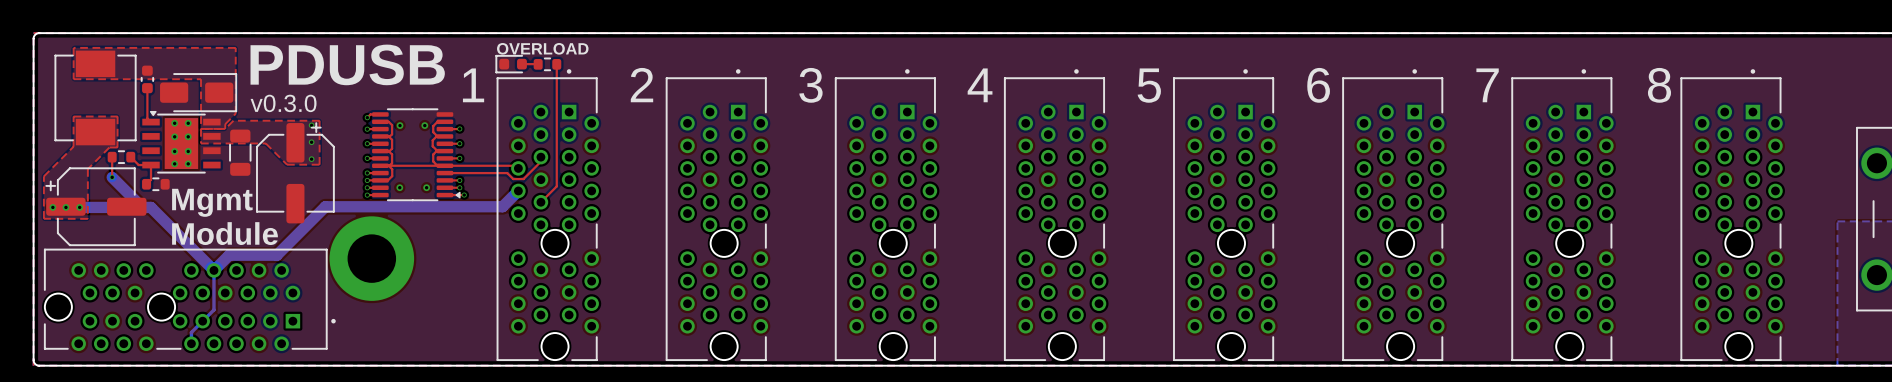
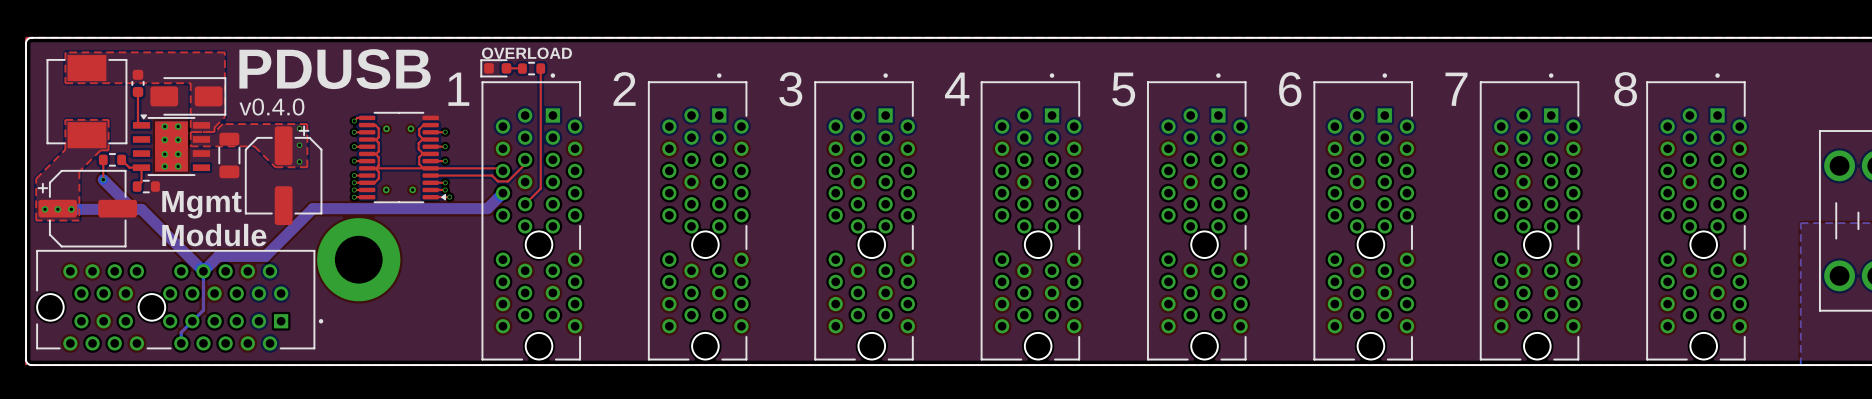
text: v0.3.0 (283, 103) -> v0.4.0 (271, 107)

